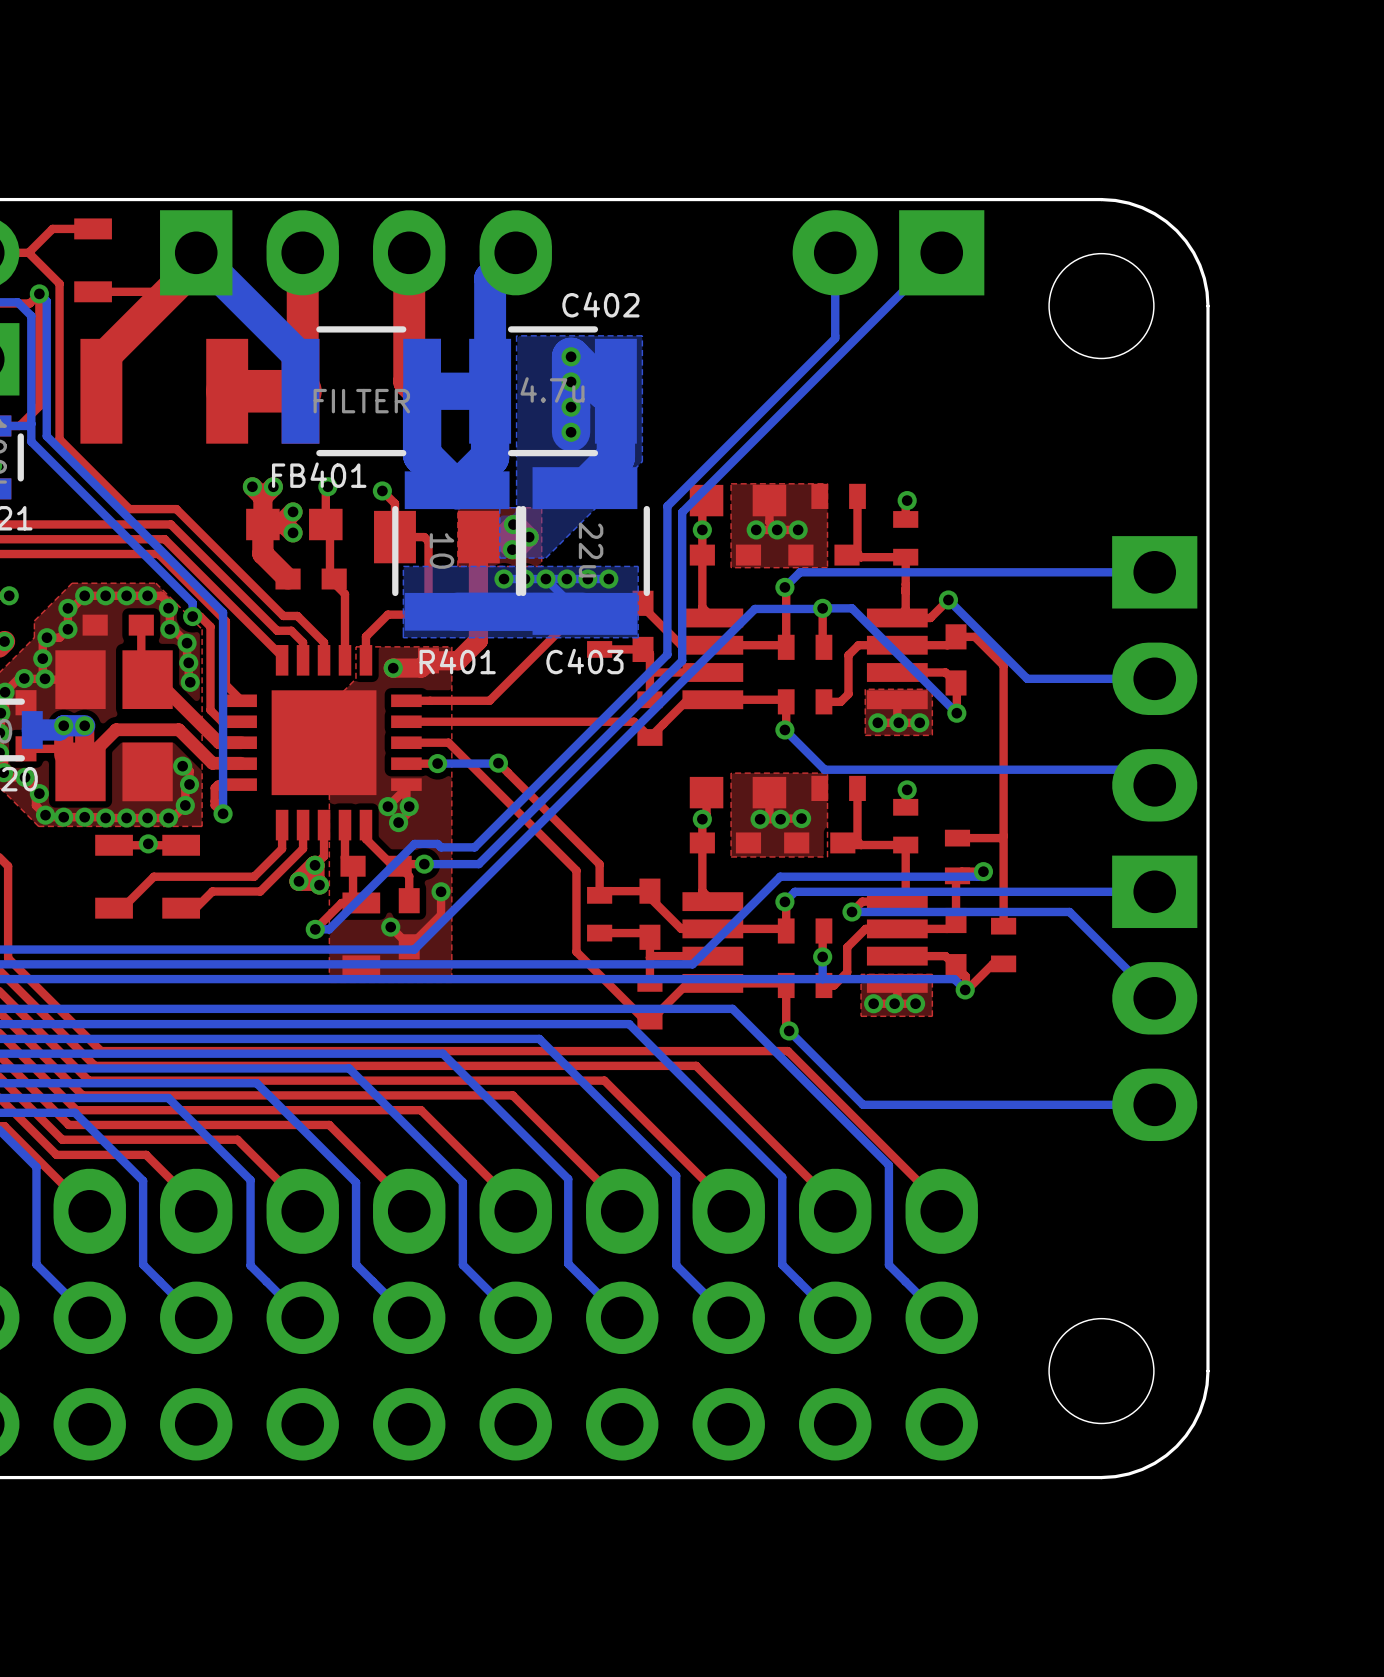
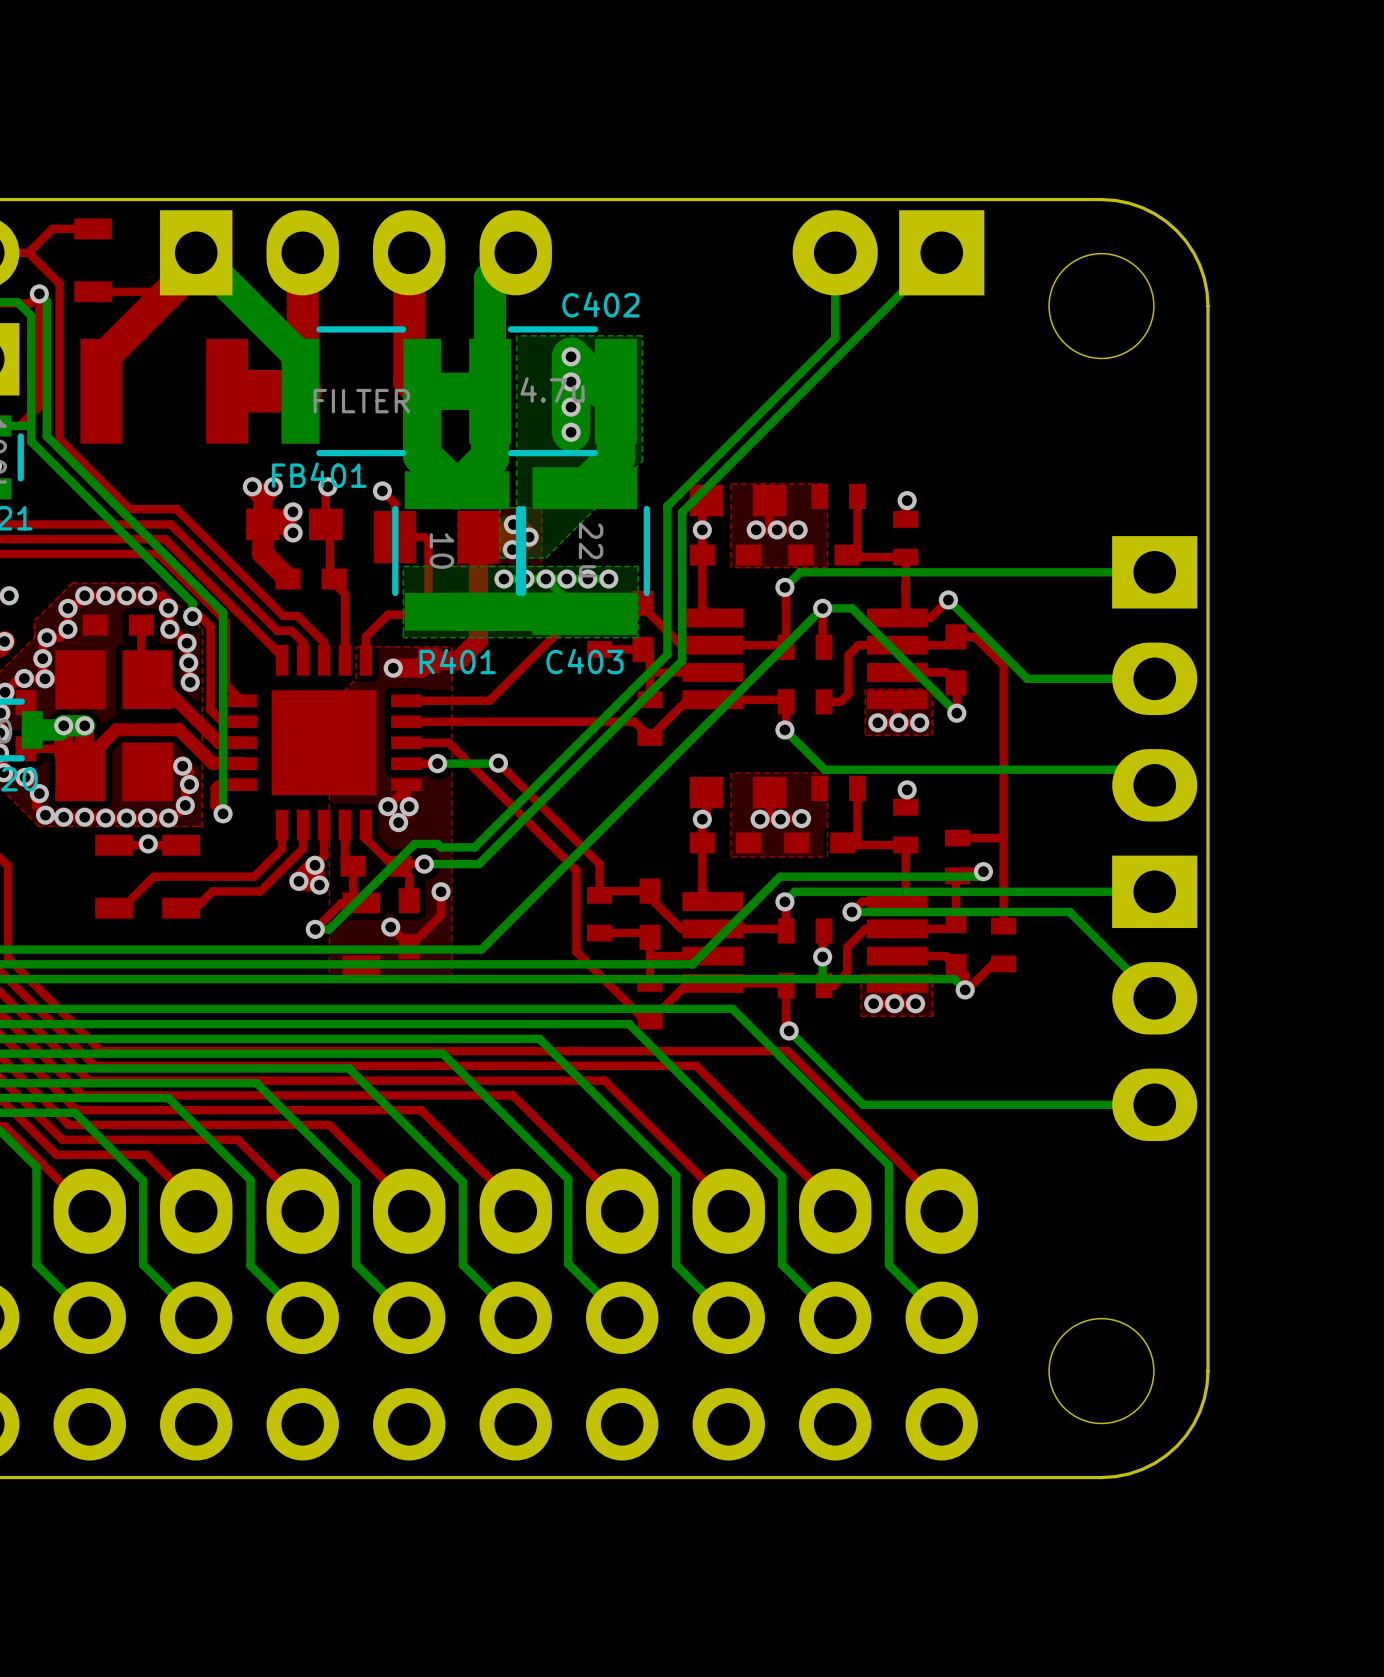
bottom track: (822, 608) (754, 608) (414, 949) -> (822, 608) (481, 949) (414, 949)

